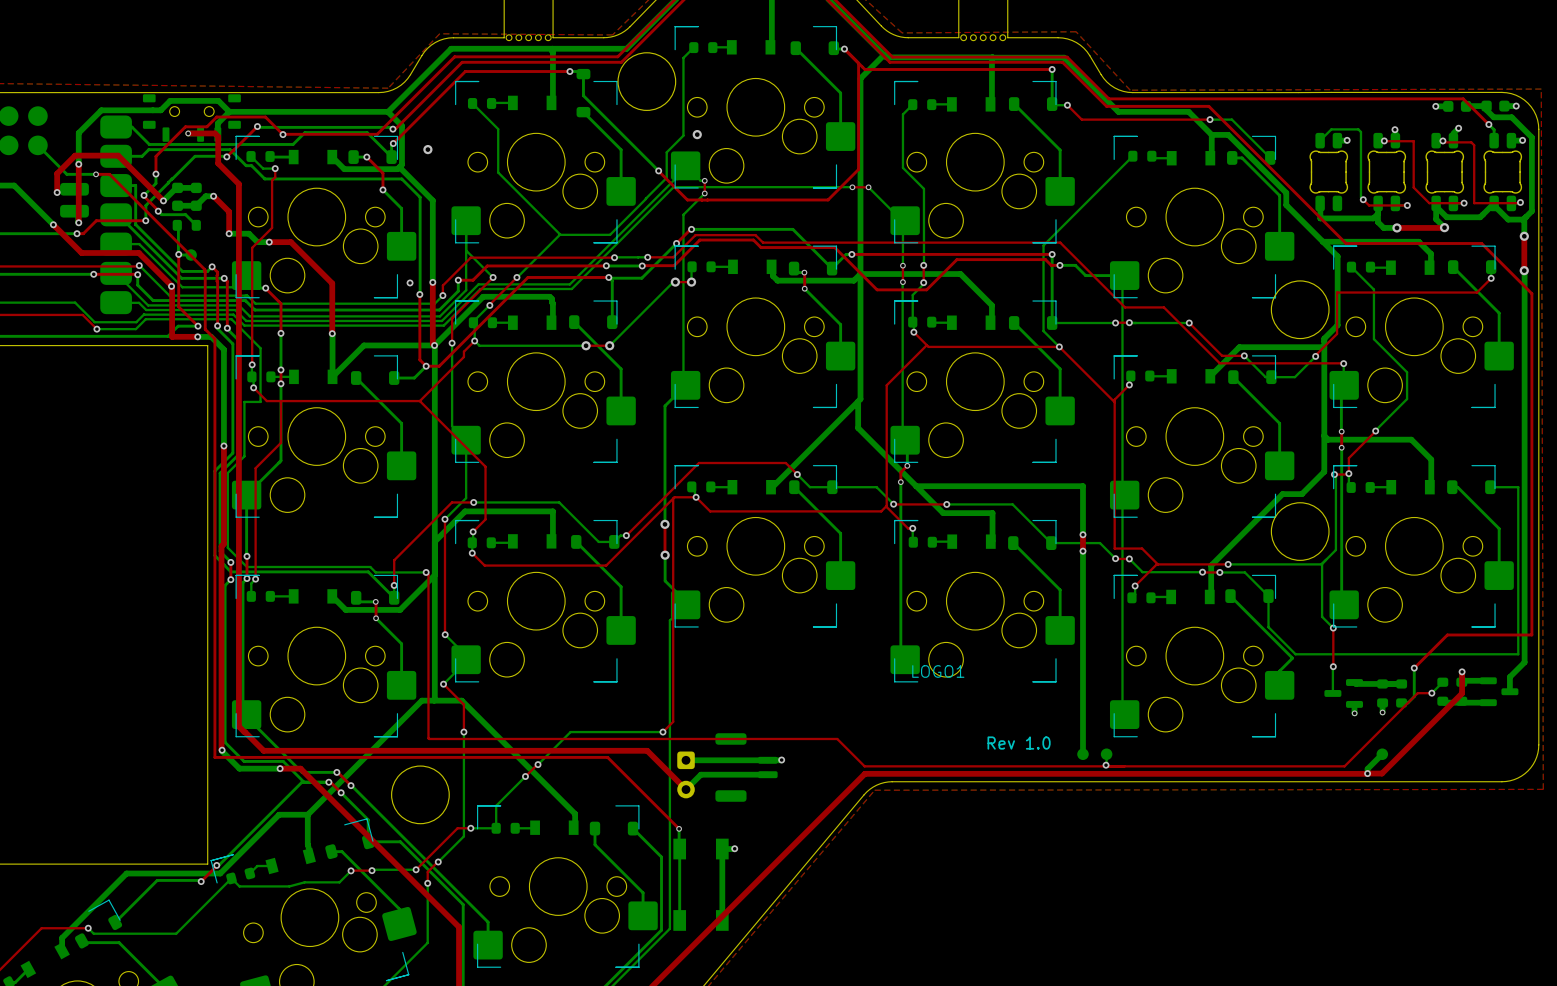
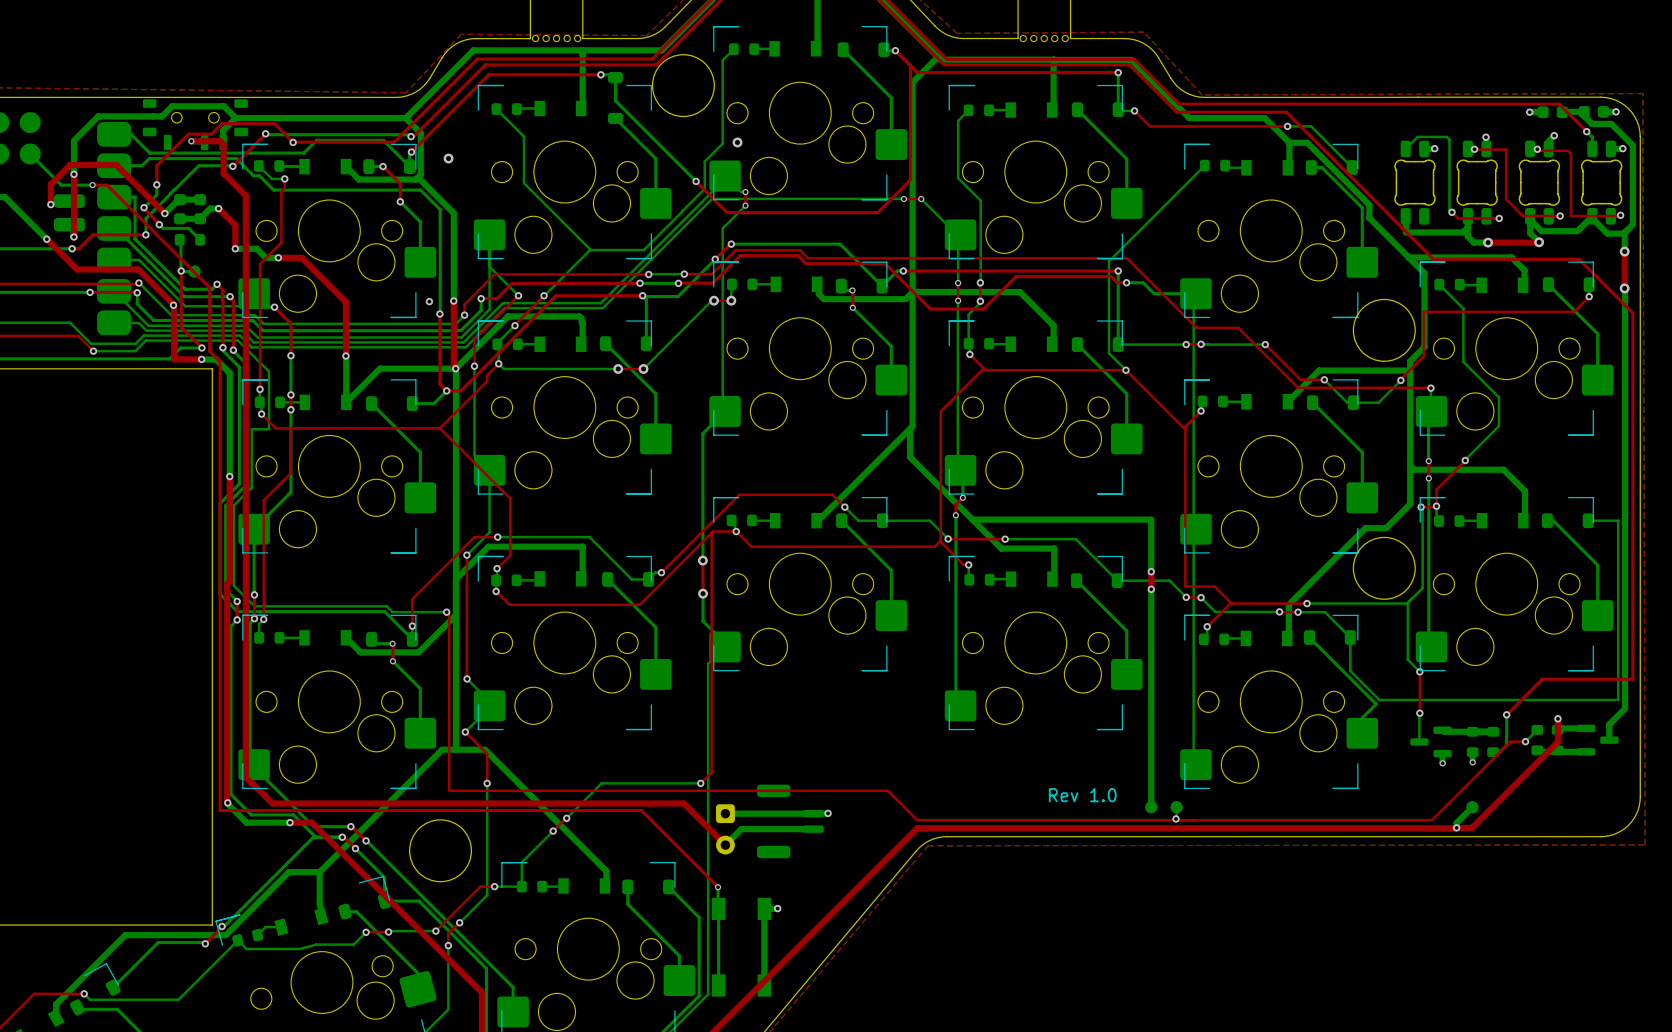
LOGO1: (938, 671) -> none

